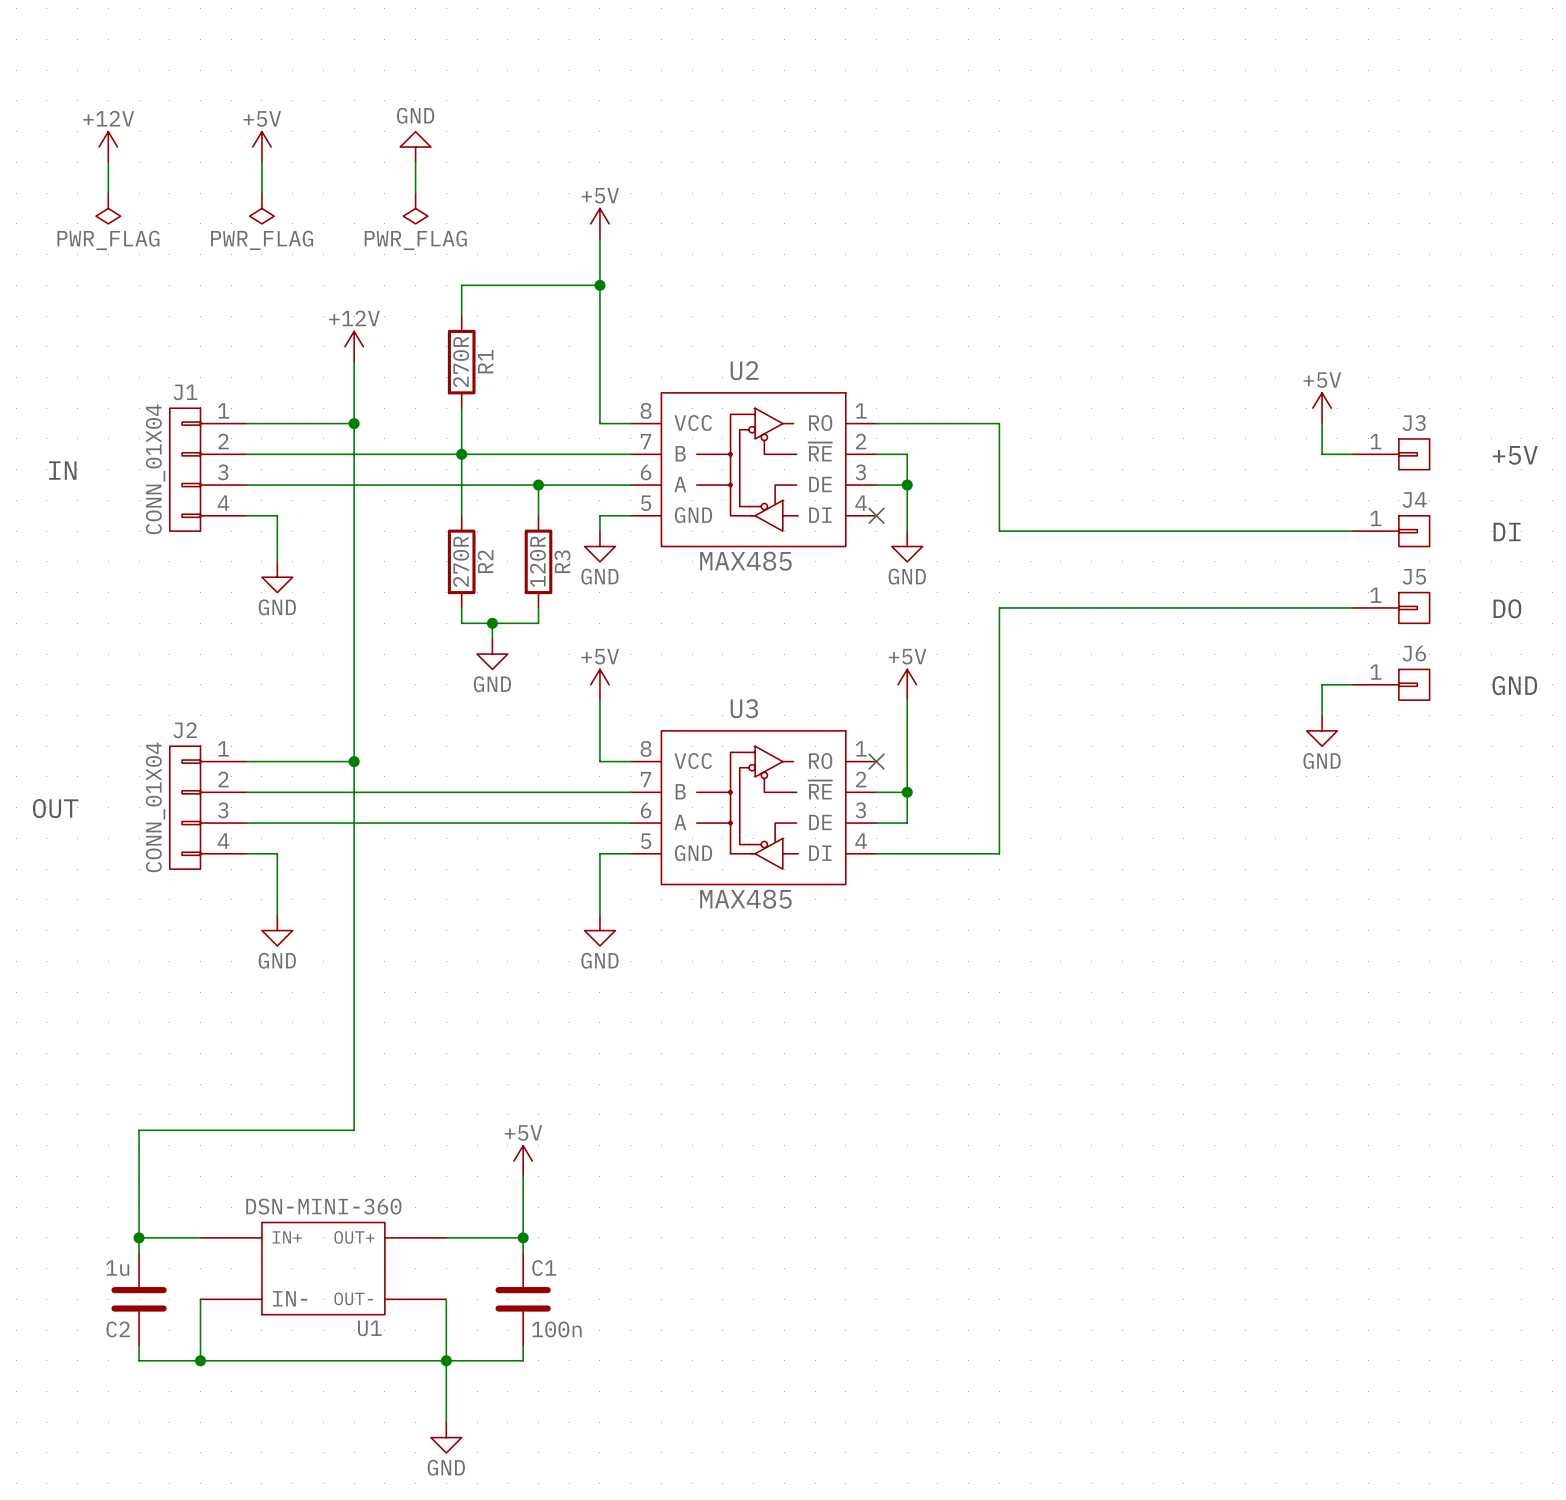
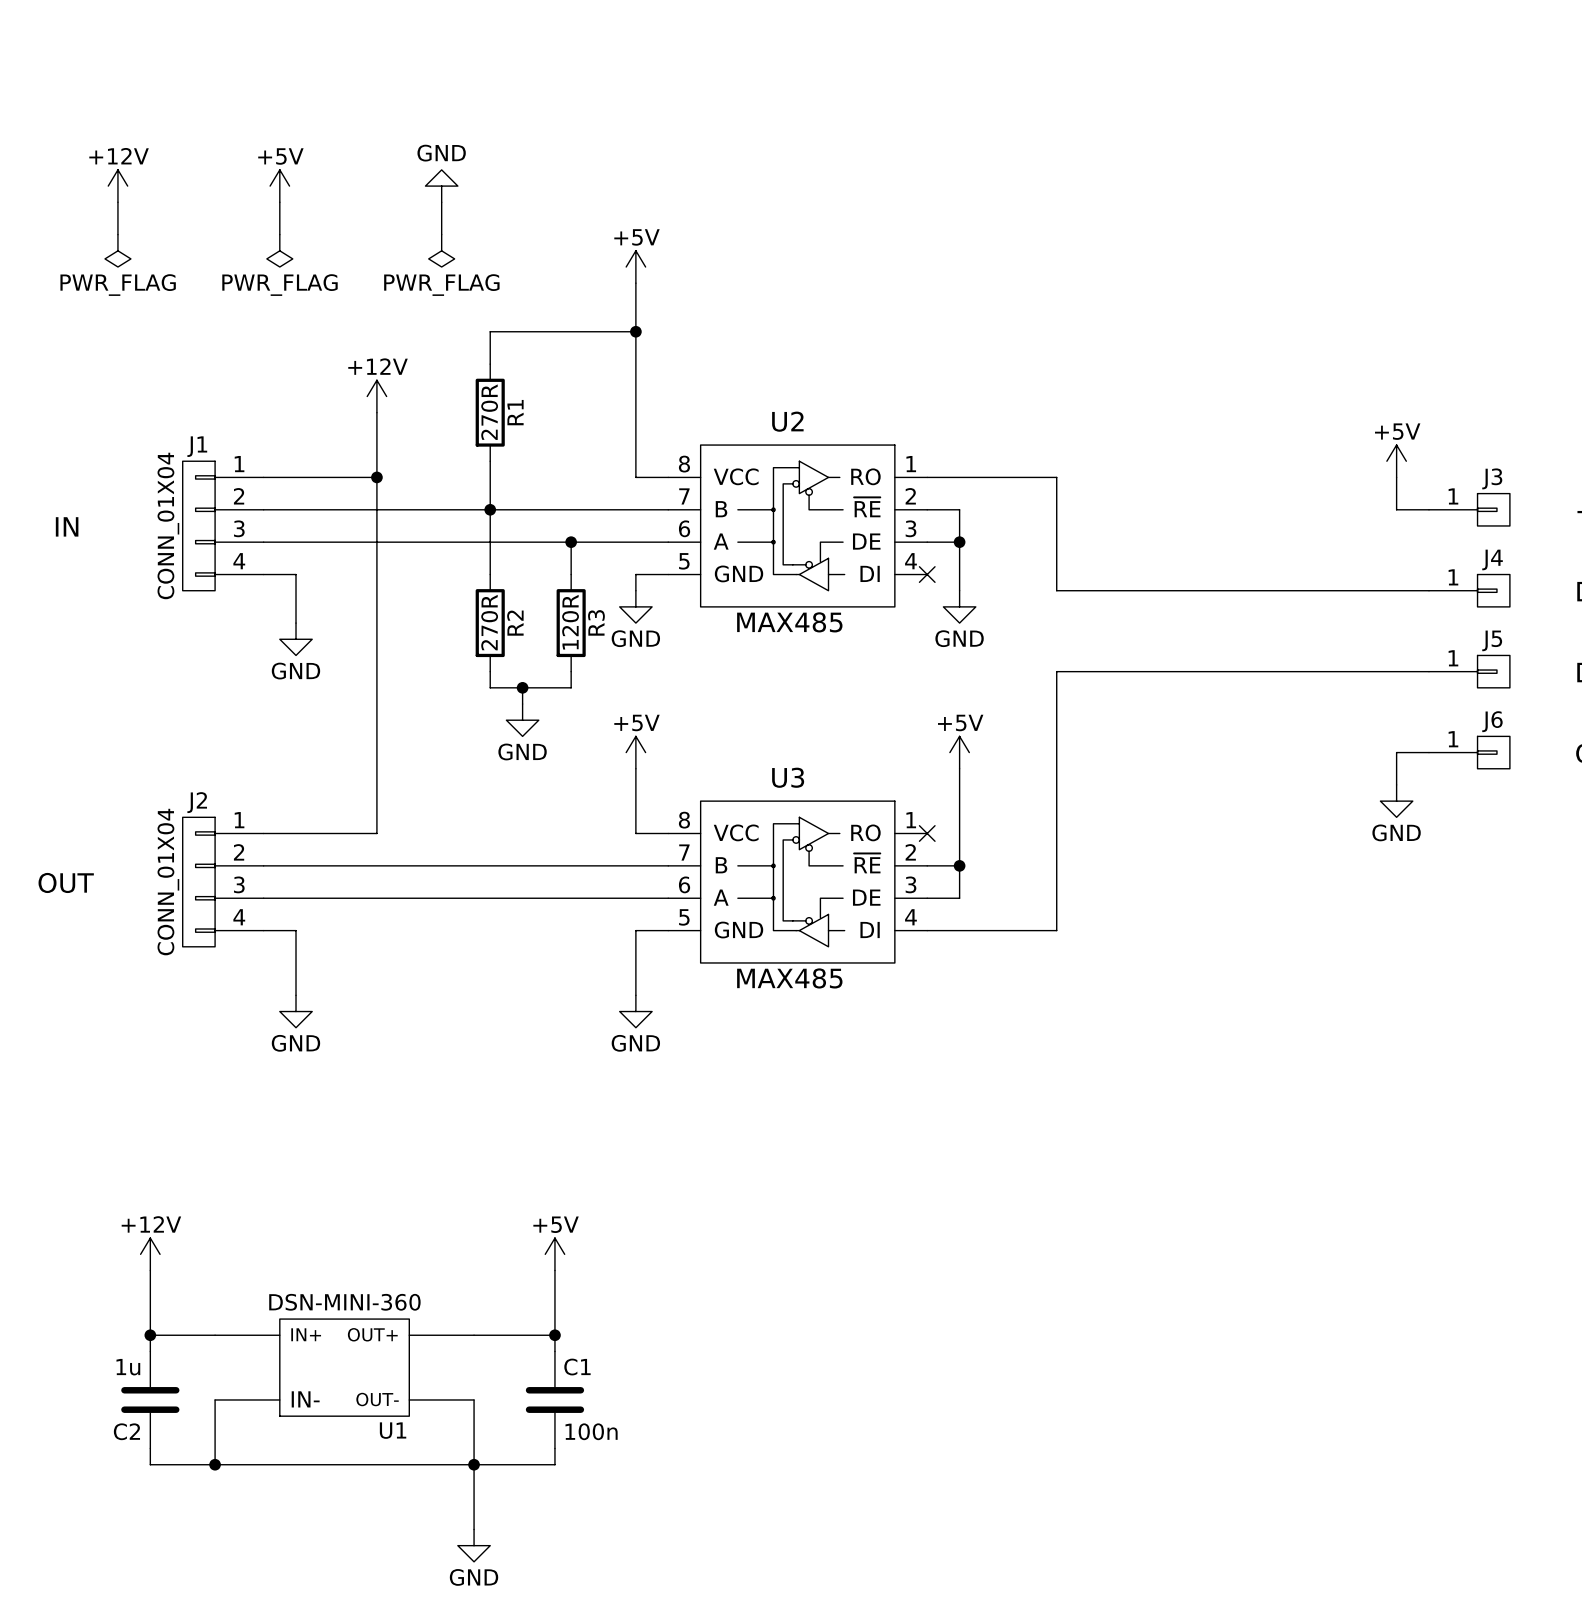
wire: (354, 761) (354, 1130) (139, 1130) (139, 1176) -> none
junction: (354, 761) -> none
power symbol: none -> +12V (150, 1254)

